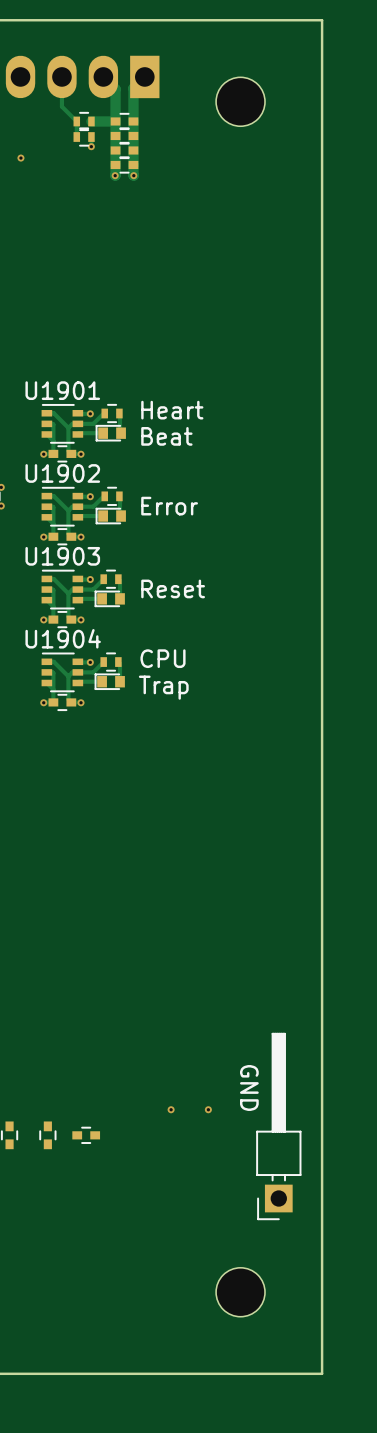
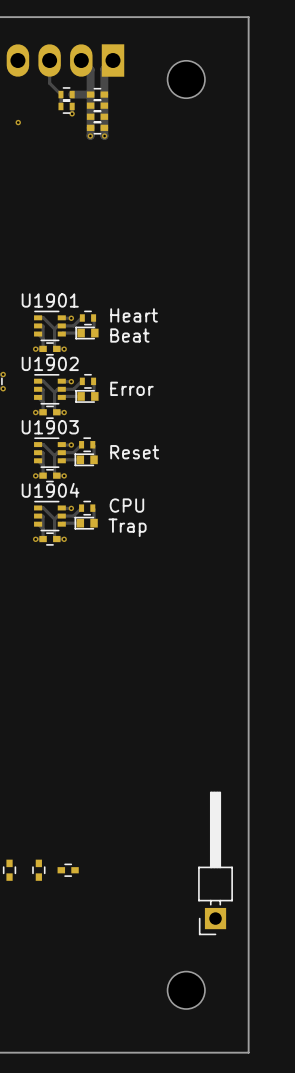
text: GND (249, 1087) -> none
via: (171, 1109) -> none
via: (208, 1109) -> none

